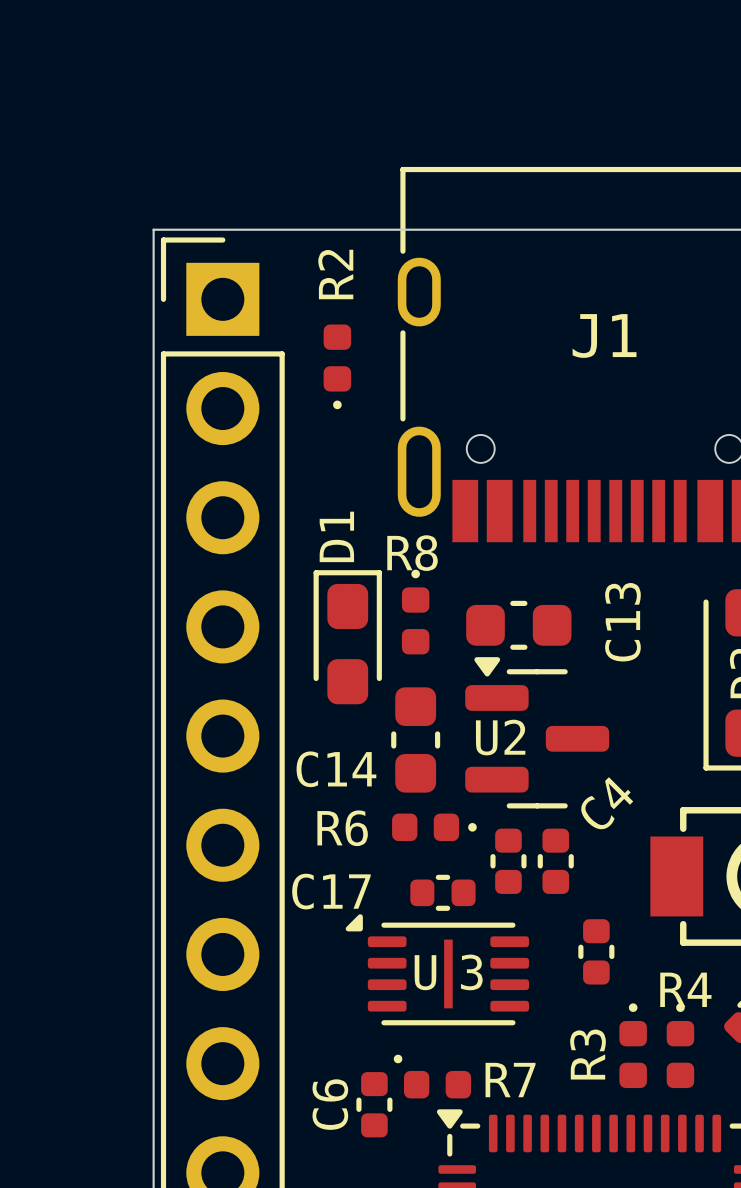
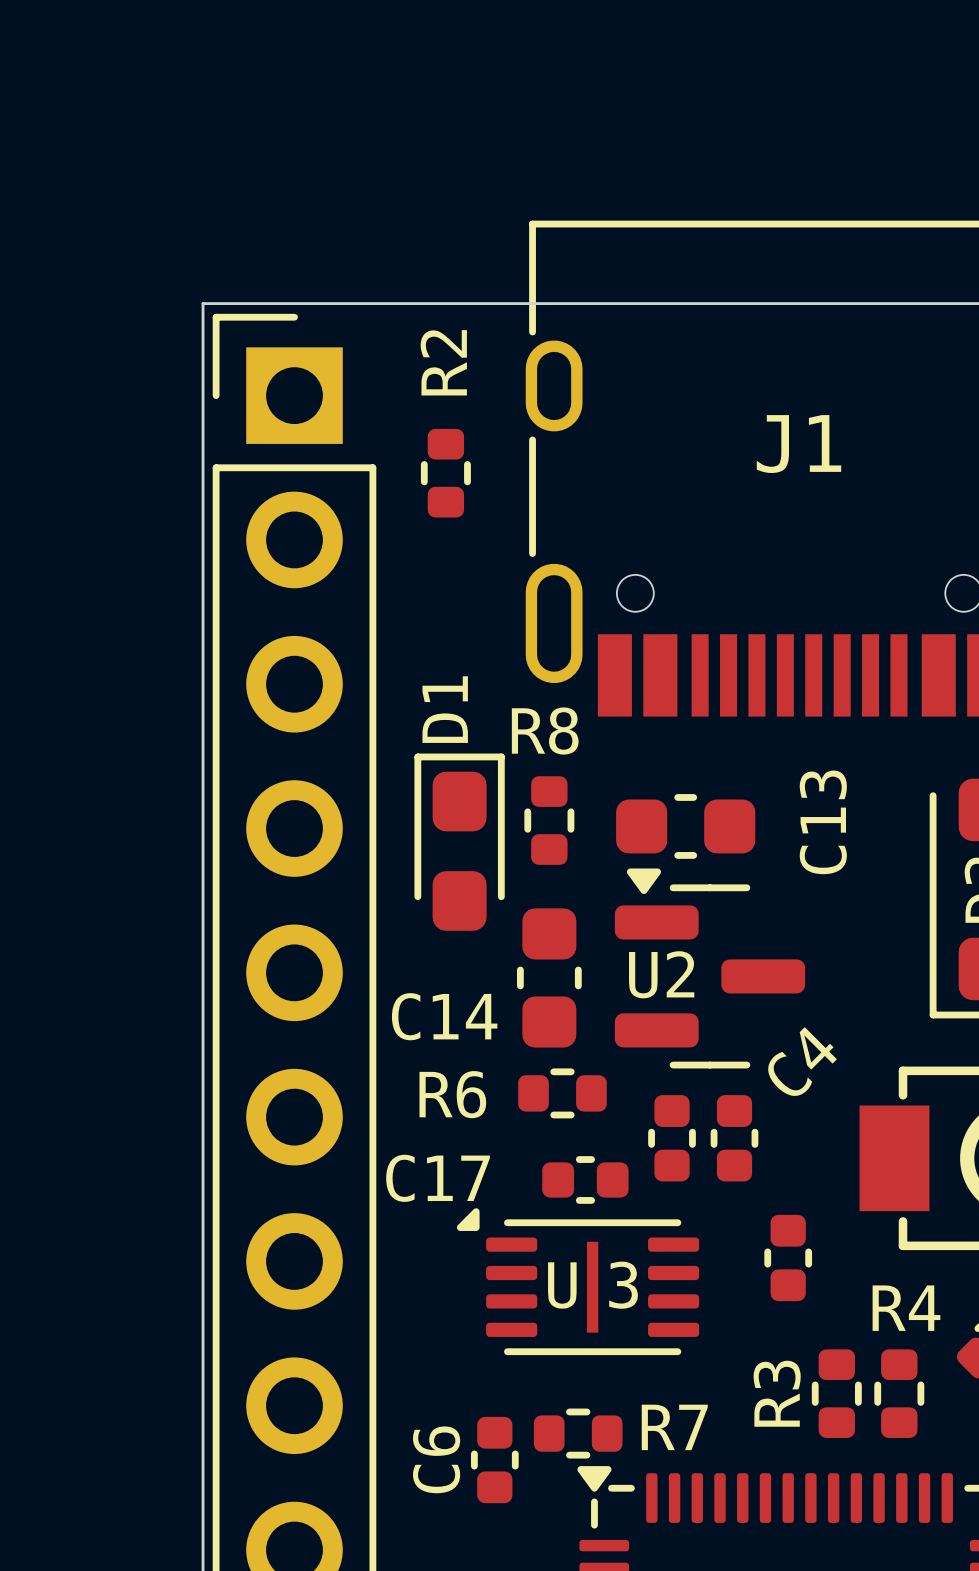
R2 footprint: [323, 324, 352, 410] -> [420, 428, 471, 518]
R8 footprint: [401, 569, 430, 655] -> [524, 776, 575, 865]
R6 footprint: [392, 813, 477, 842] -> [518, 1068, 607, 1119]
R3 footprint: [619, 1003, 647, 1089] -> [811, 1349, 862, 1438]
R4 footprint: [666, 1003, 695, 1089] -> [874, 1349, 925, 1438]
R7 footprint: [393, 1054, 472, 1099] -> [533, 1408, 623, 1459]

